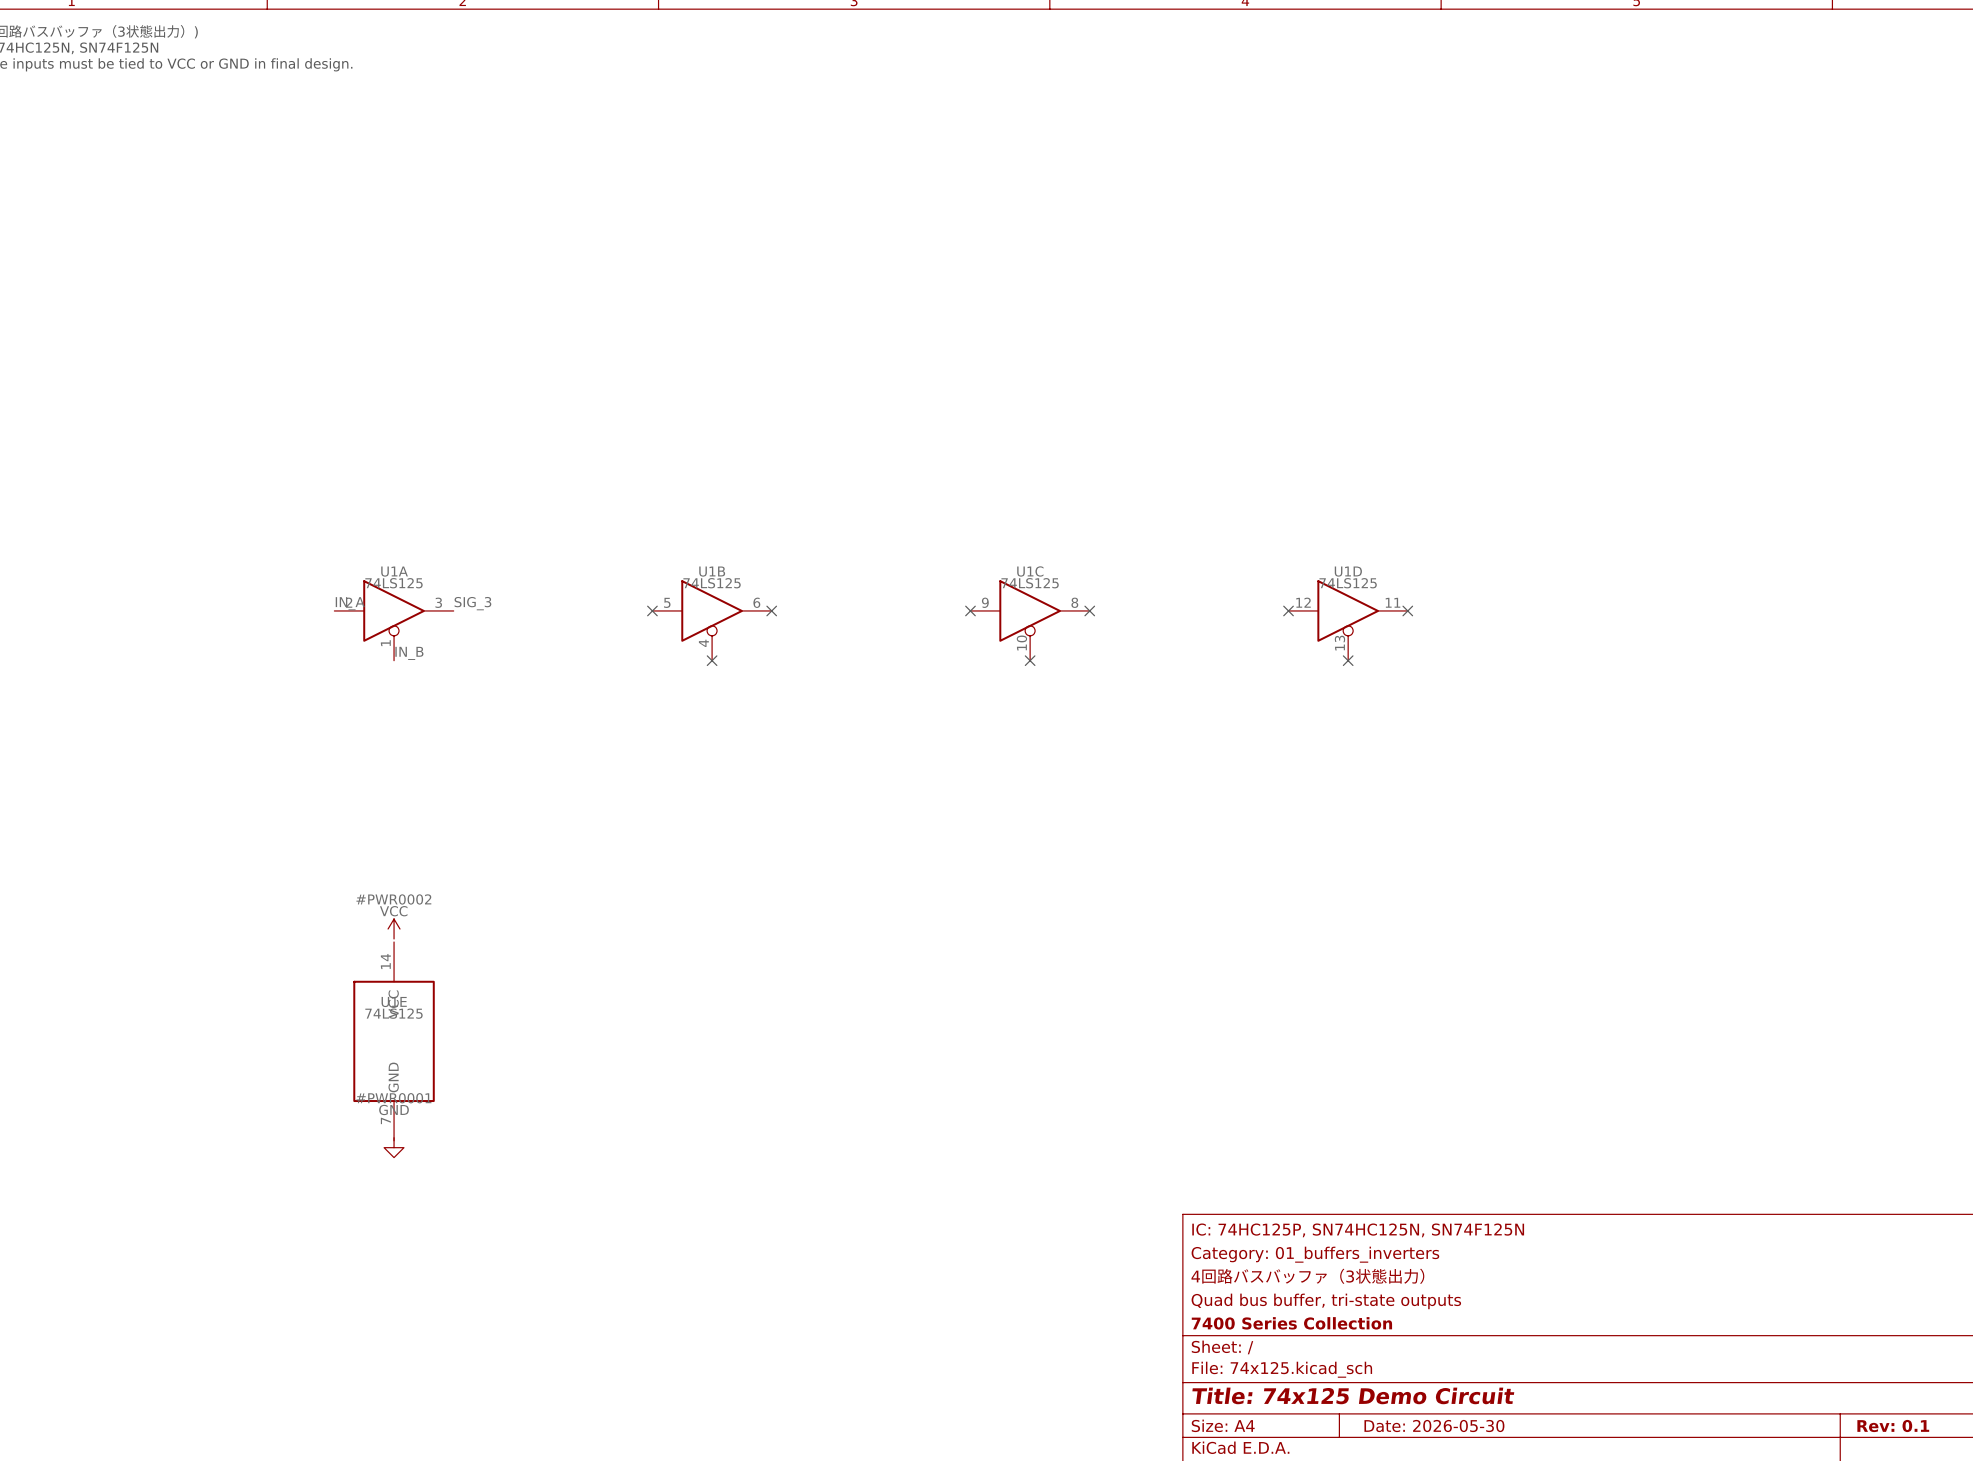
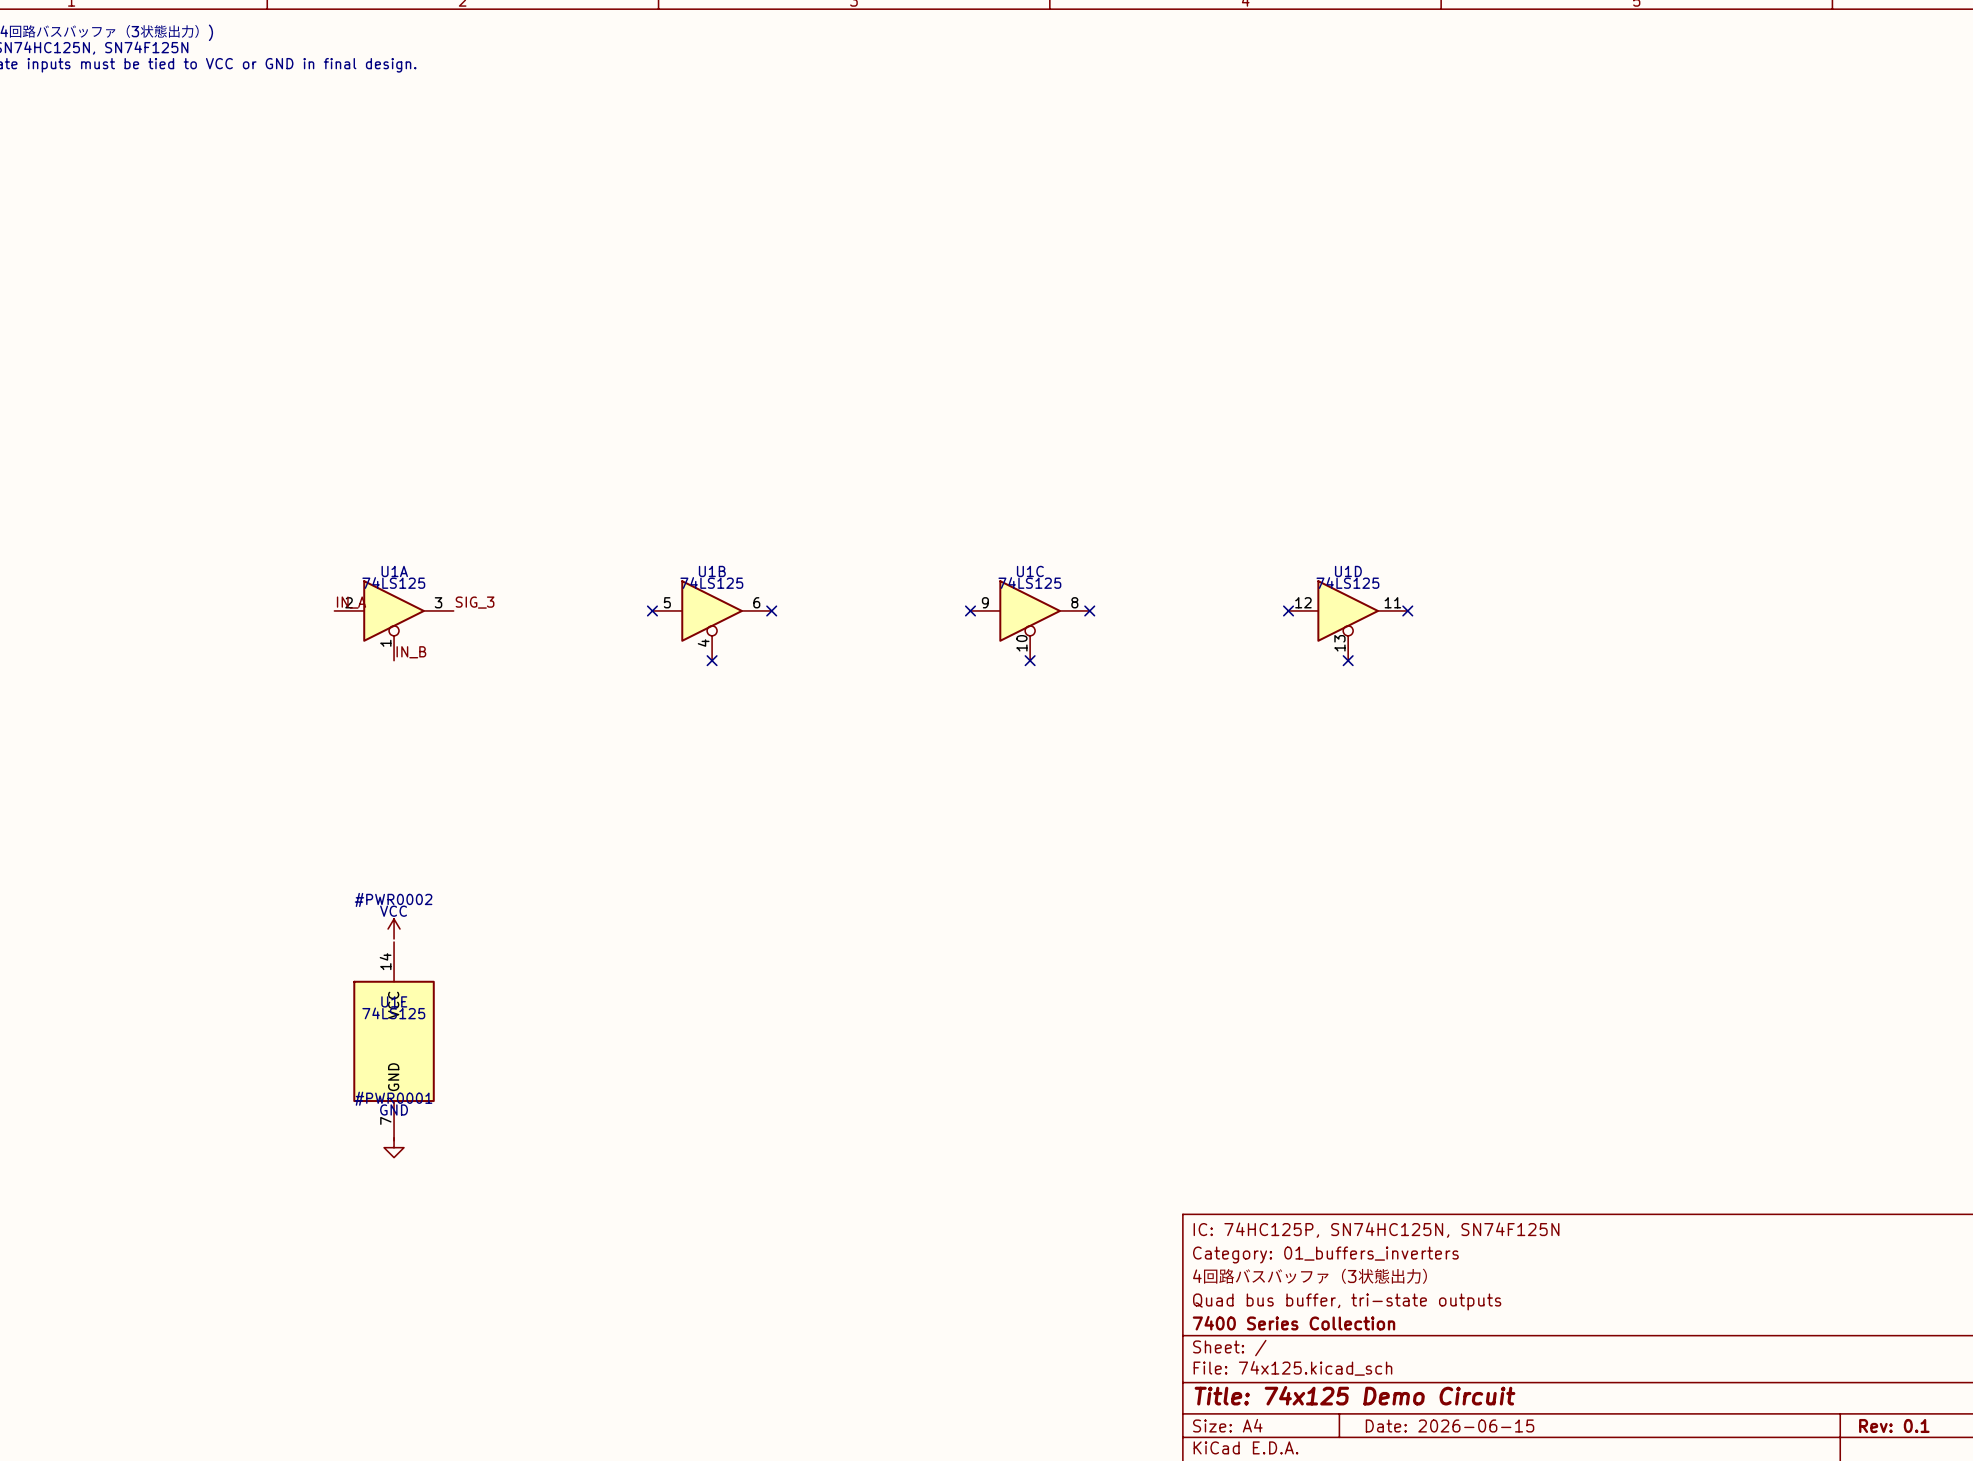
title block: Date: 2026-05-30 (1434, 1426) -> Date: 2026-06-15 (1450, 1425)

